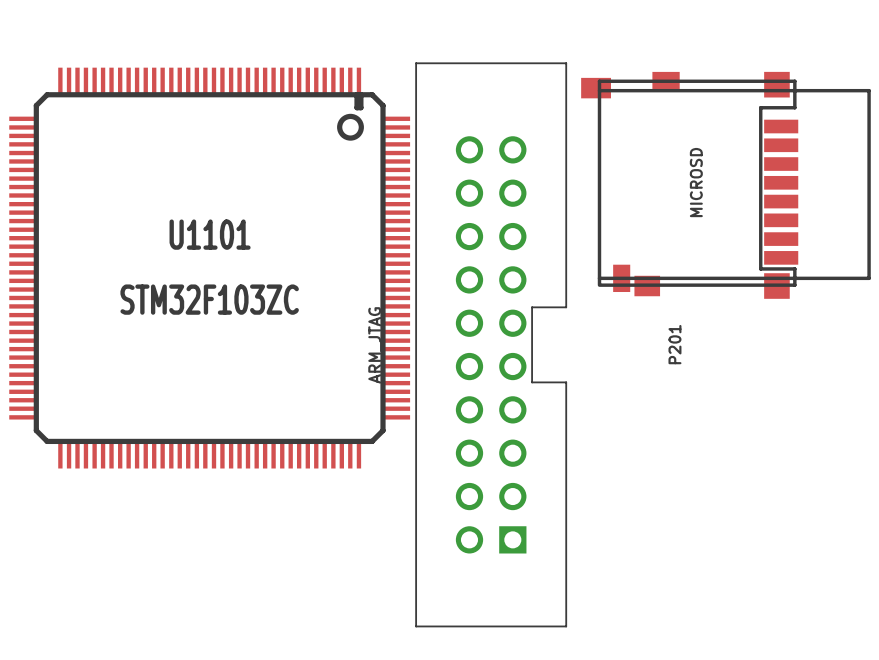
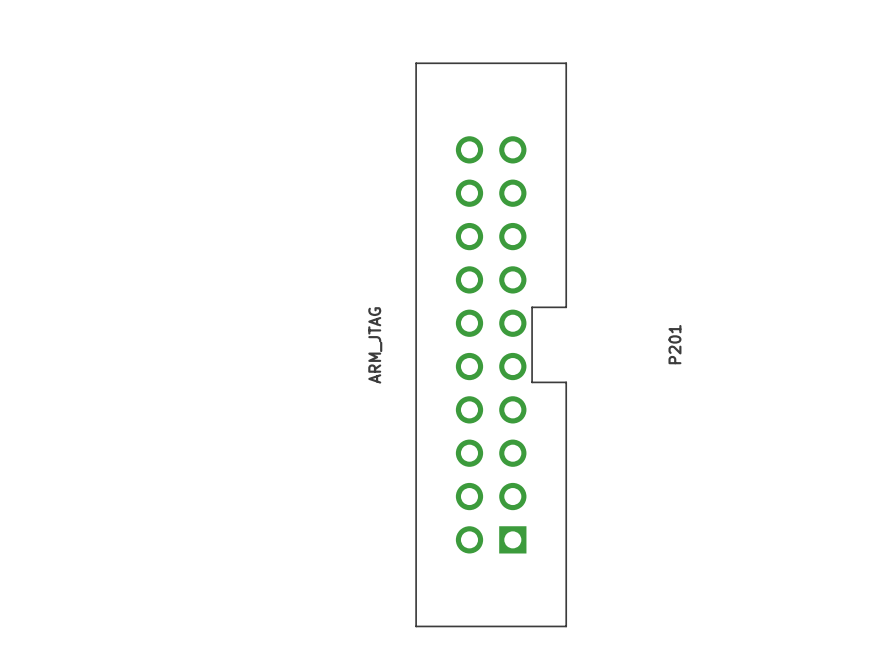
part: MICROSD (725, 185) -> none
U1101: STM32F103ZC (209, 268) -> none

